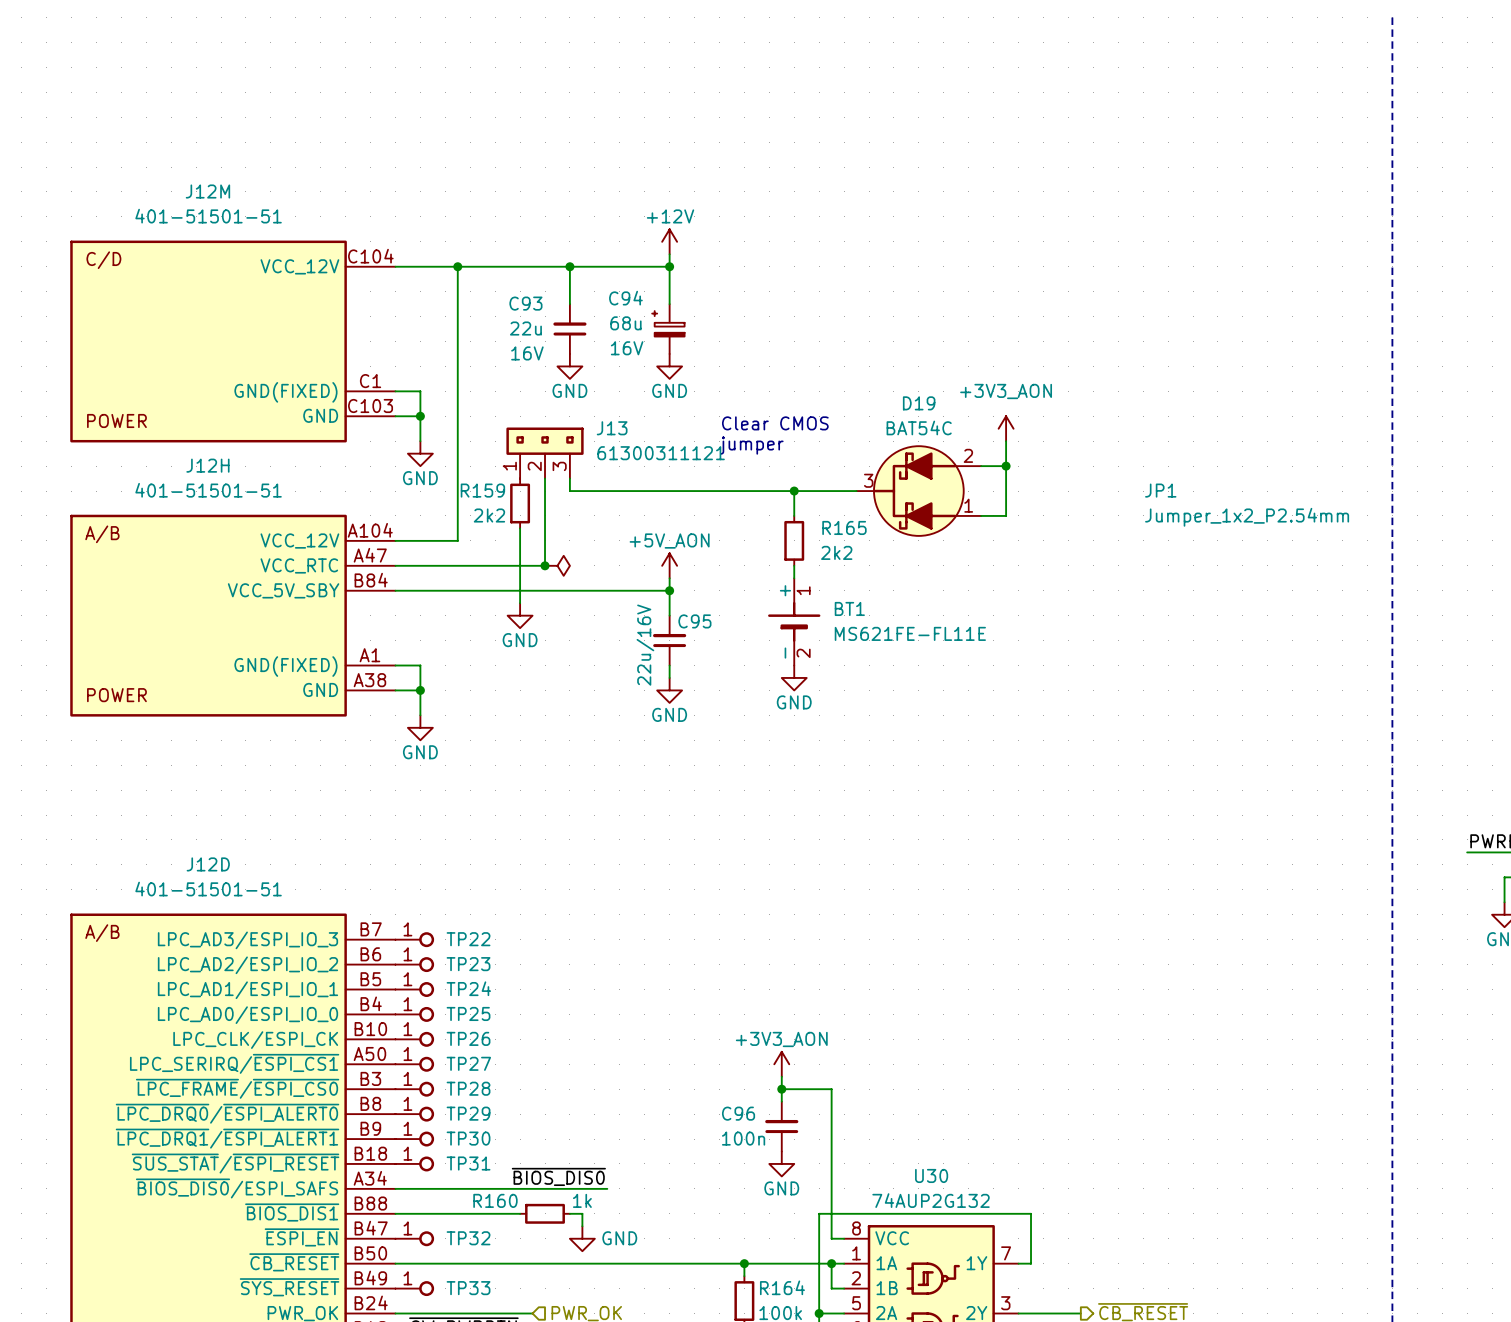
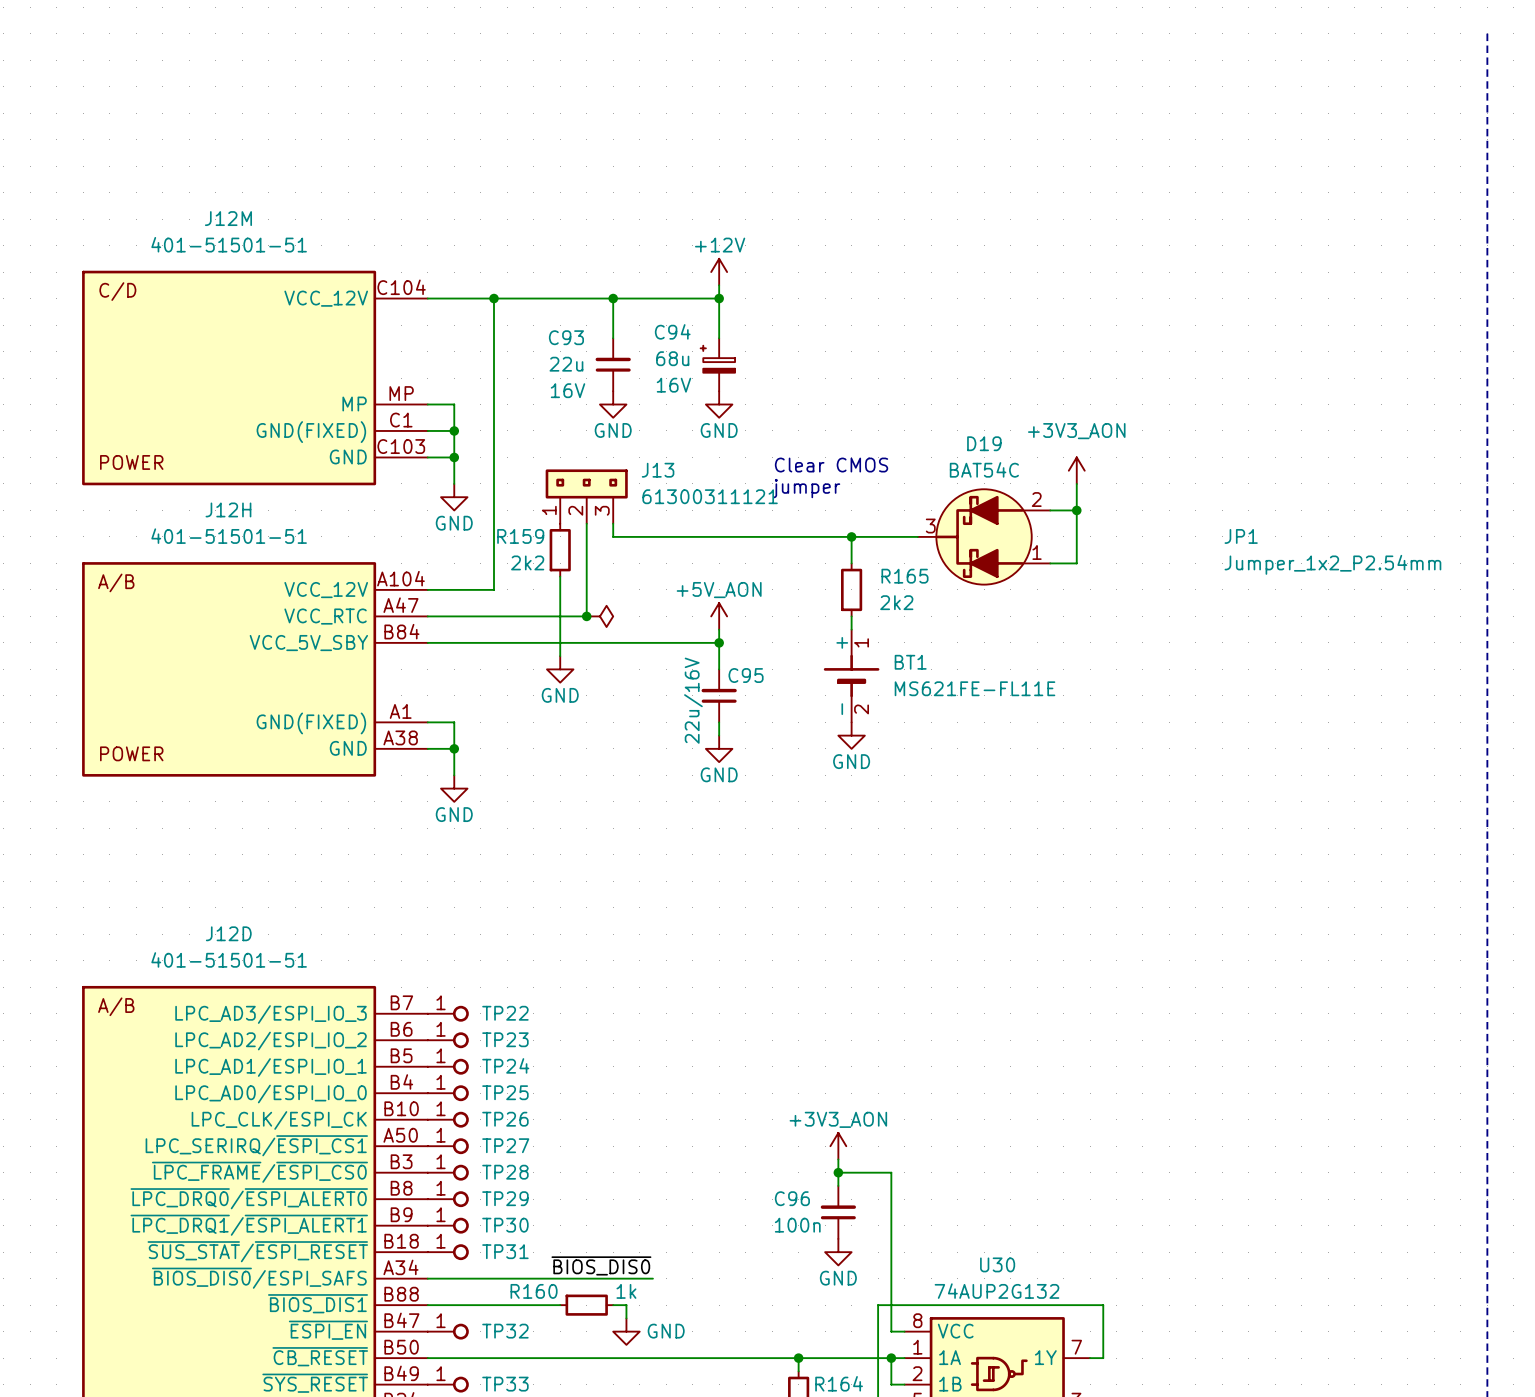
J12M symbol: [70, 240, 396, 443] -> [82, 270, 428, 486]
wire: none -> (427, 404) (454, 404) (454, 430)
junction: none -> (454, 430)

